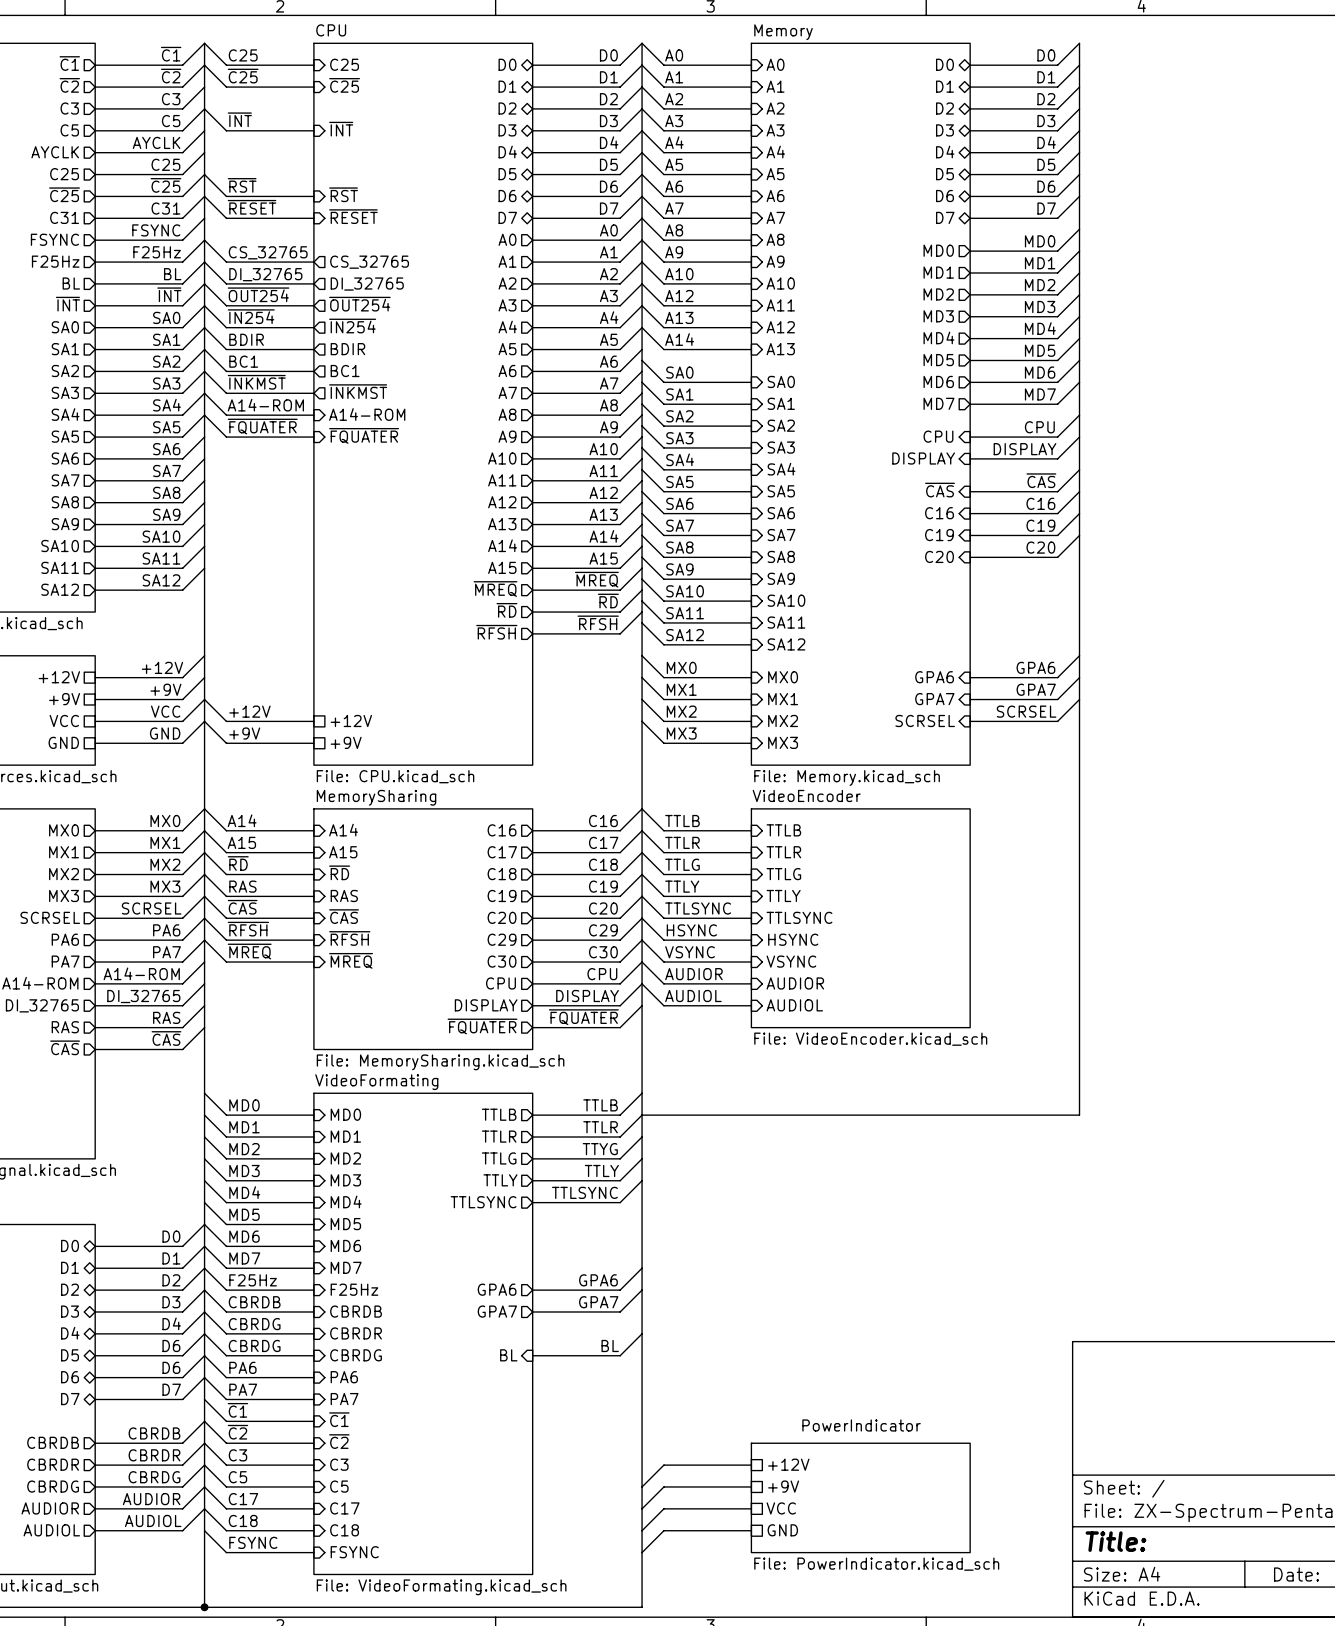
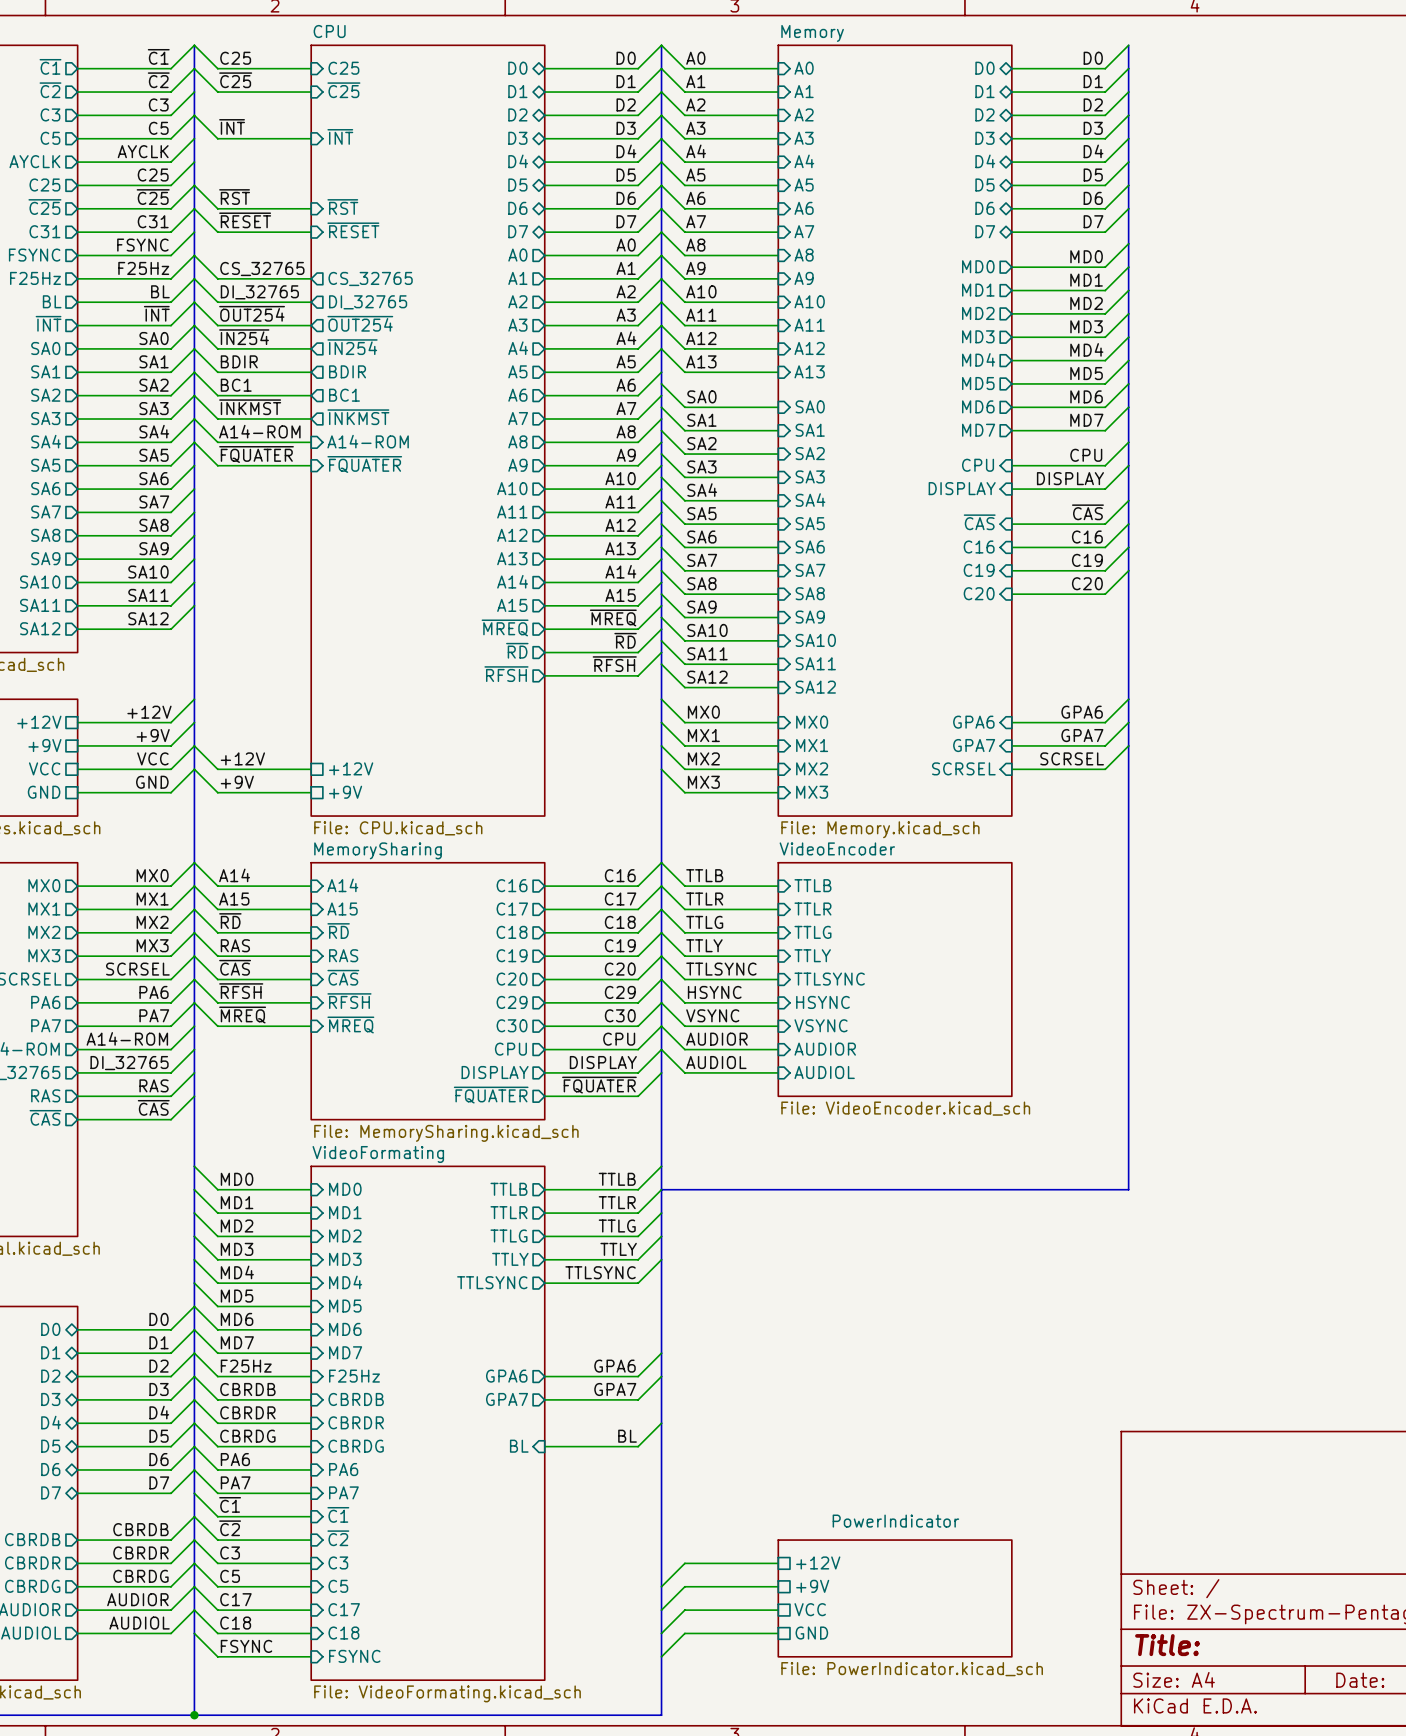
label: A12 (679, 296) -> A11 (701, 315)
label: A13 (679, 317) -> A12 (701, 338)
label: A14 (679, 339) -> A13 (701, 361)
label: TTYG (600, 1149) -> TTLG (617, 1226)
label: CBRDG (254, 1324) -> CBRDR (247, 1412)
label: D6 (171, 1345) -> D5 (159, 1436)

